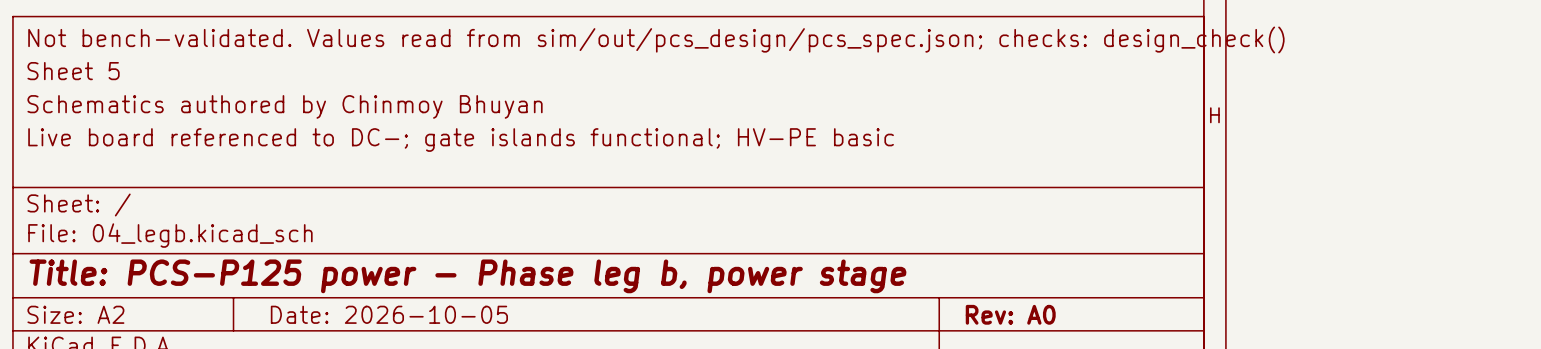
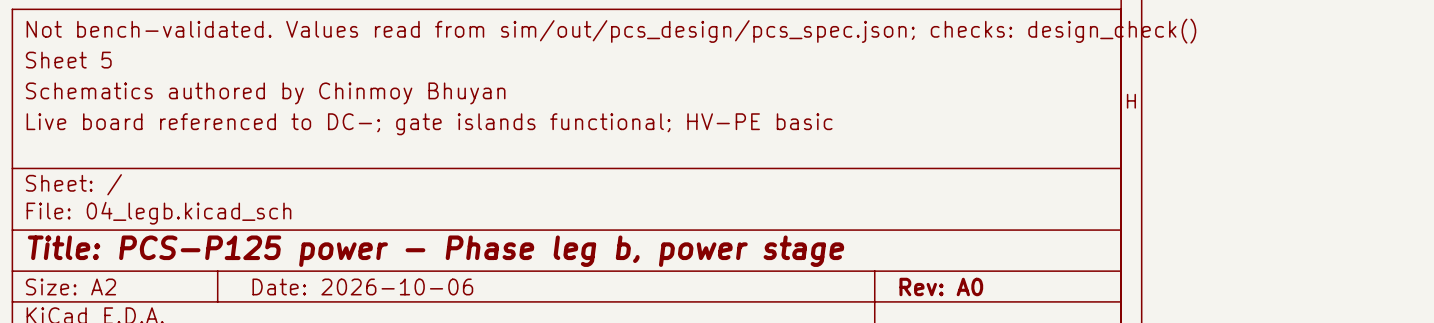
title block: Date: 2026-10-05 (389, 314) -> Date: 2026-10-06 (362, 286)

